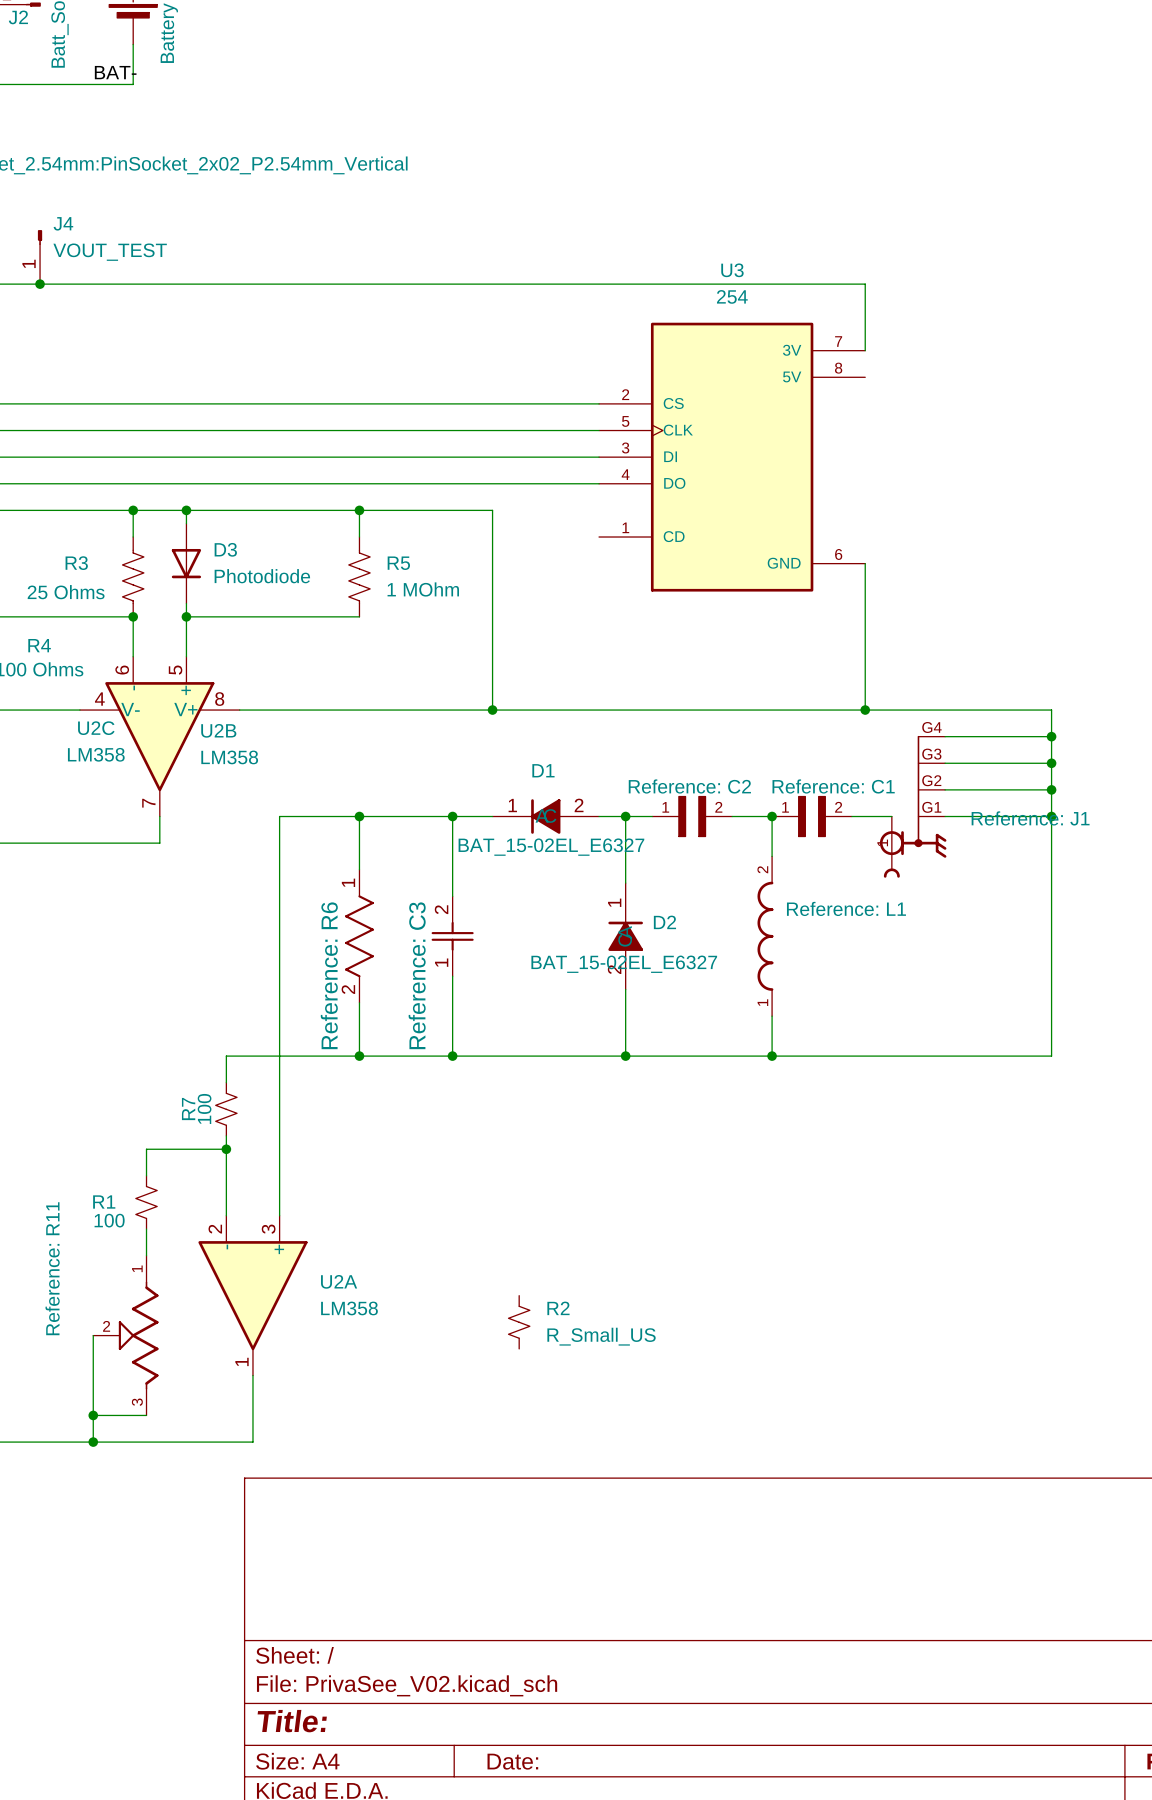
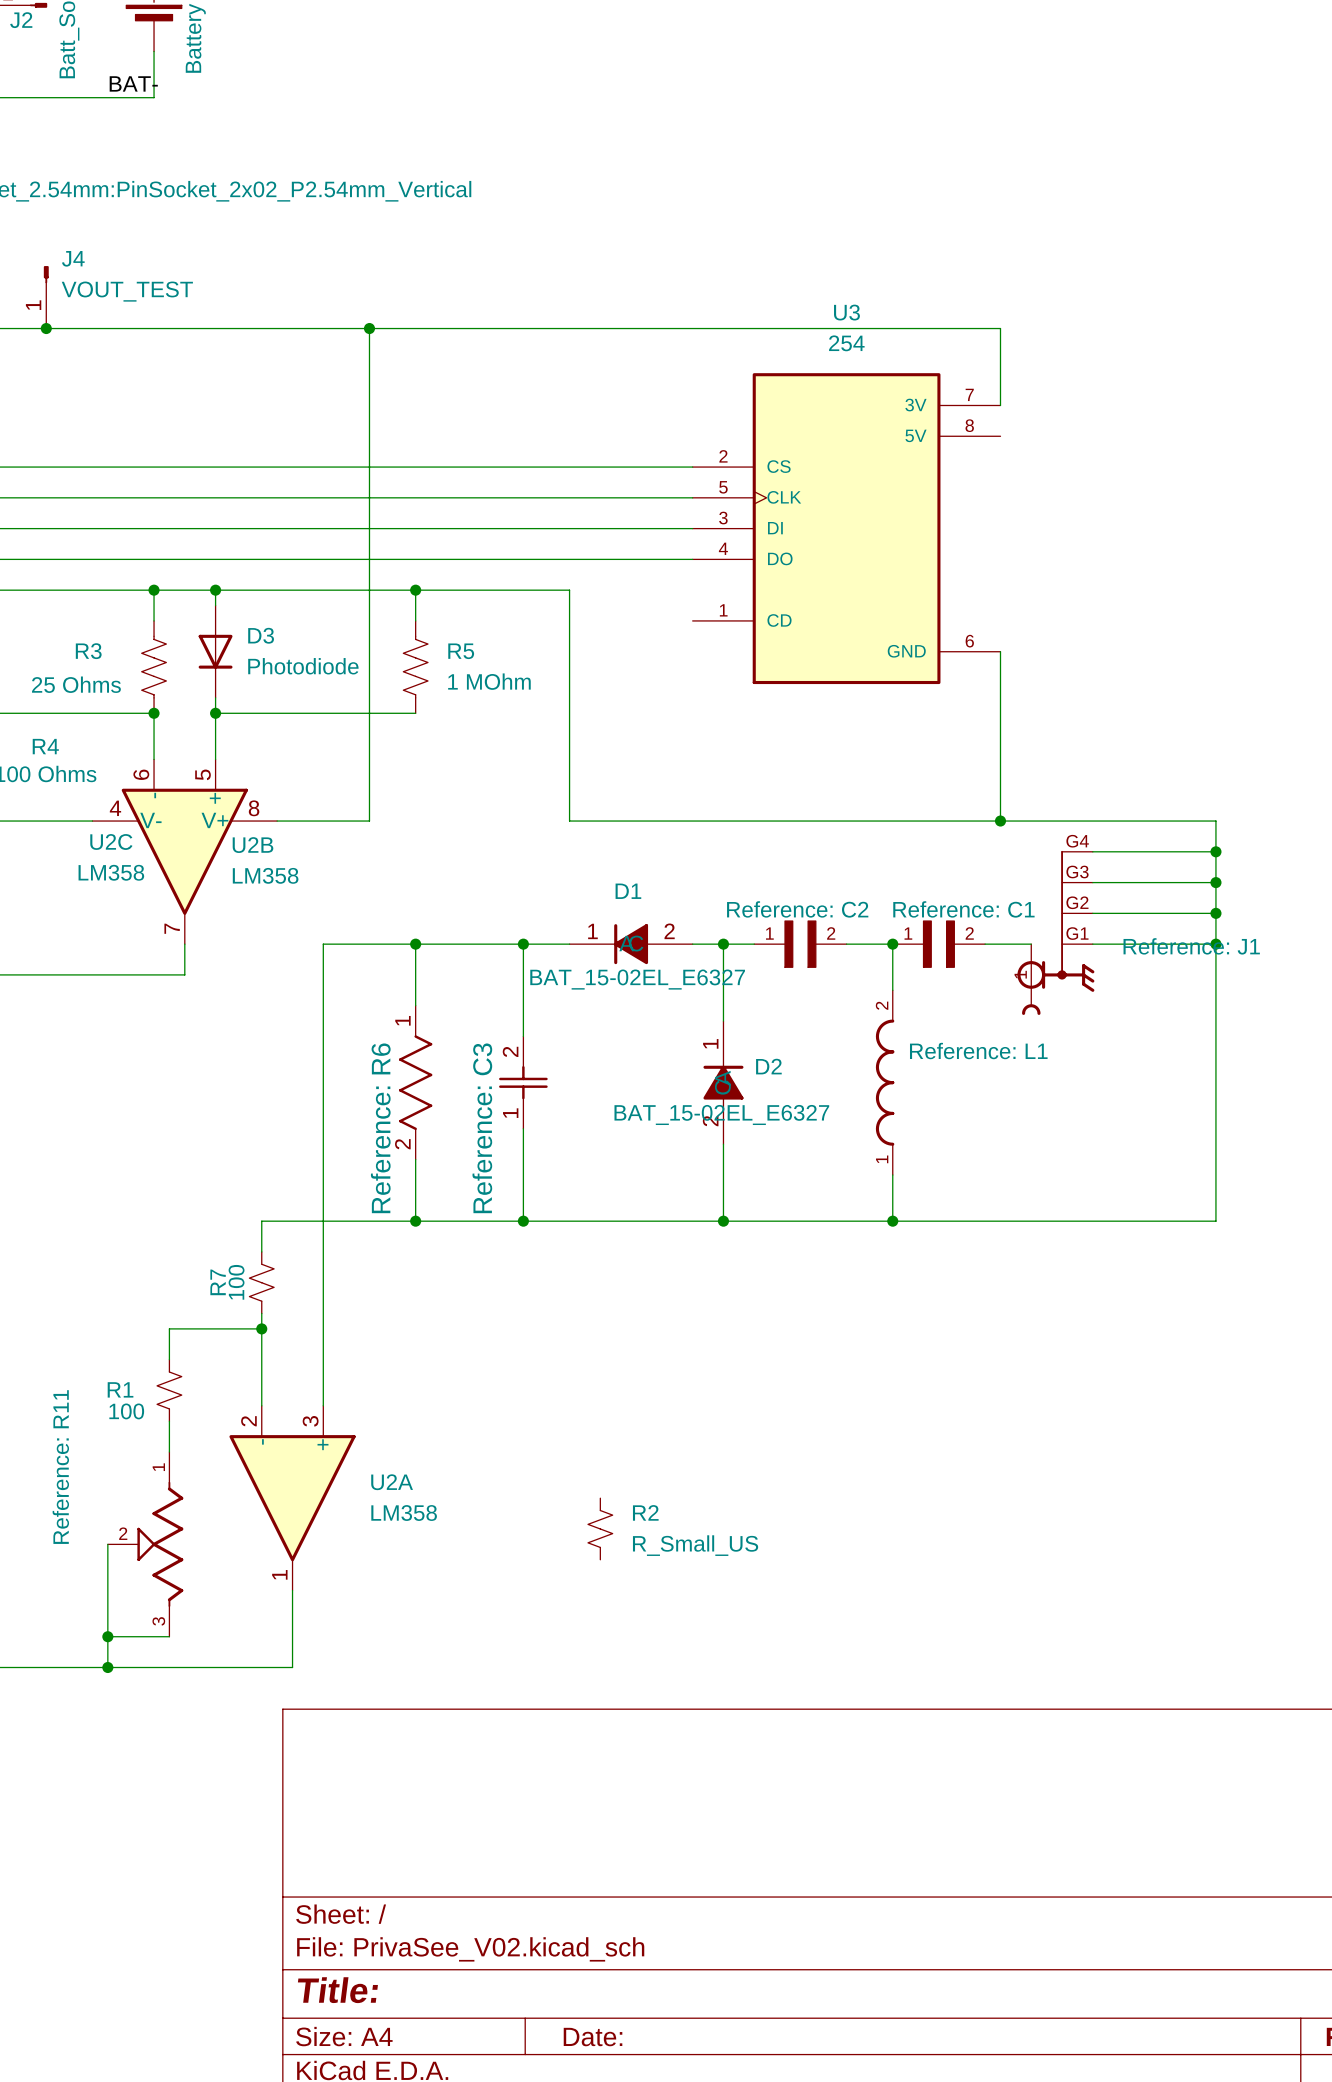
junction: none -> (369, 328)
wire: (319, 710) (492, 710) -> (369, 821) (369, 328)
junction: (492, 710) -> none

